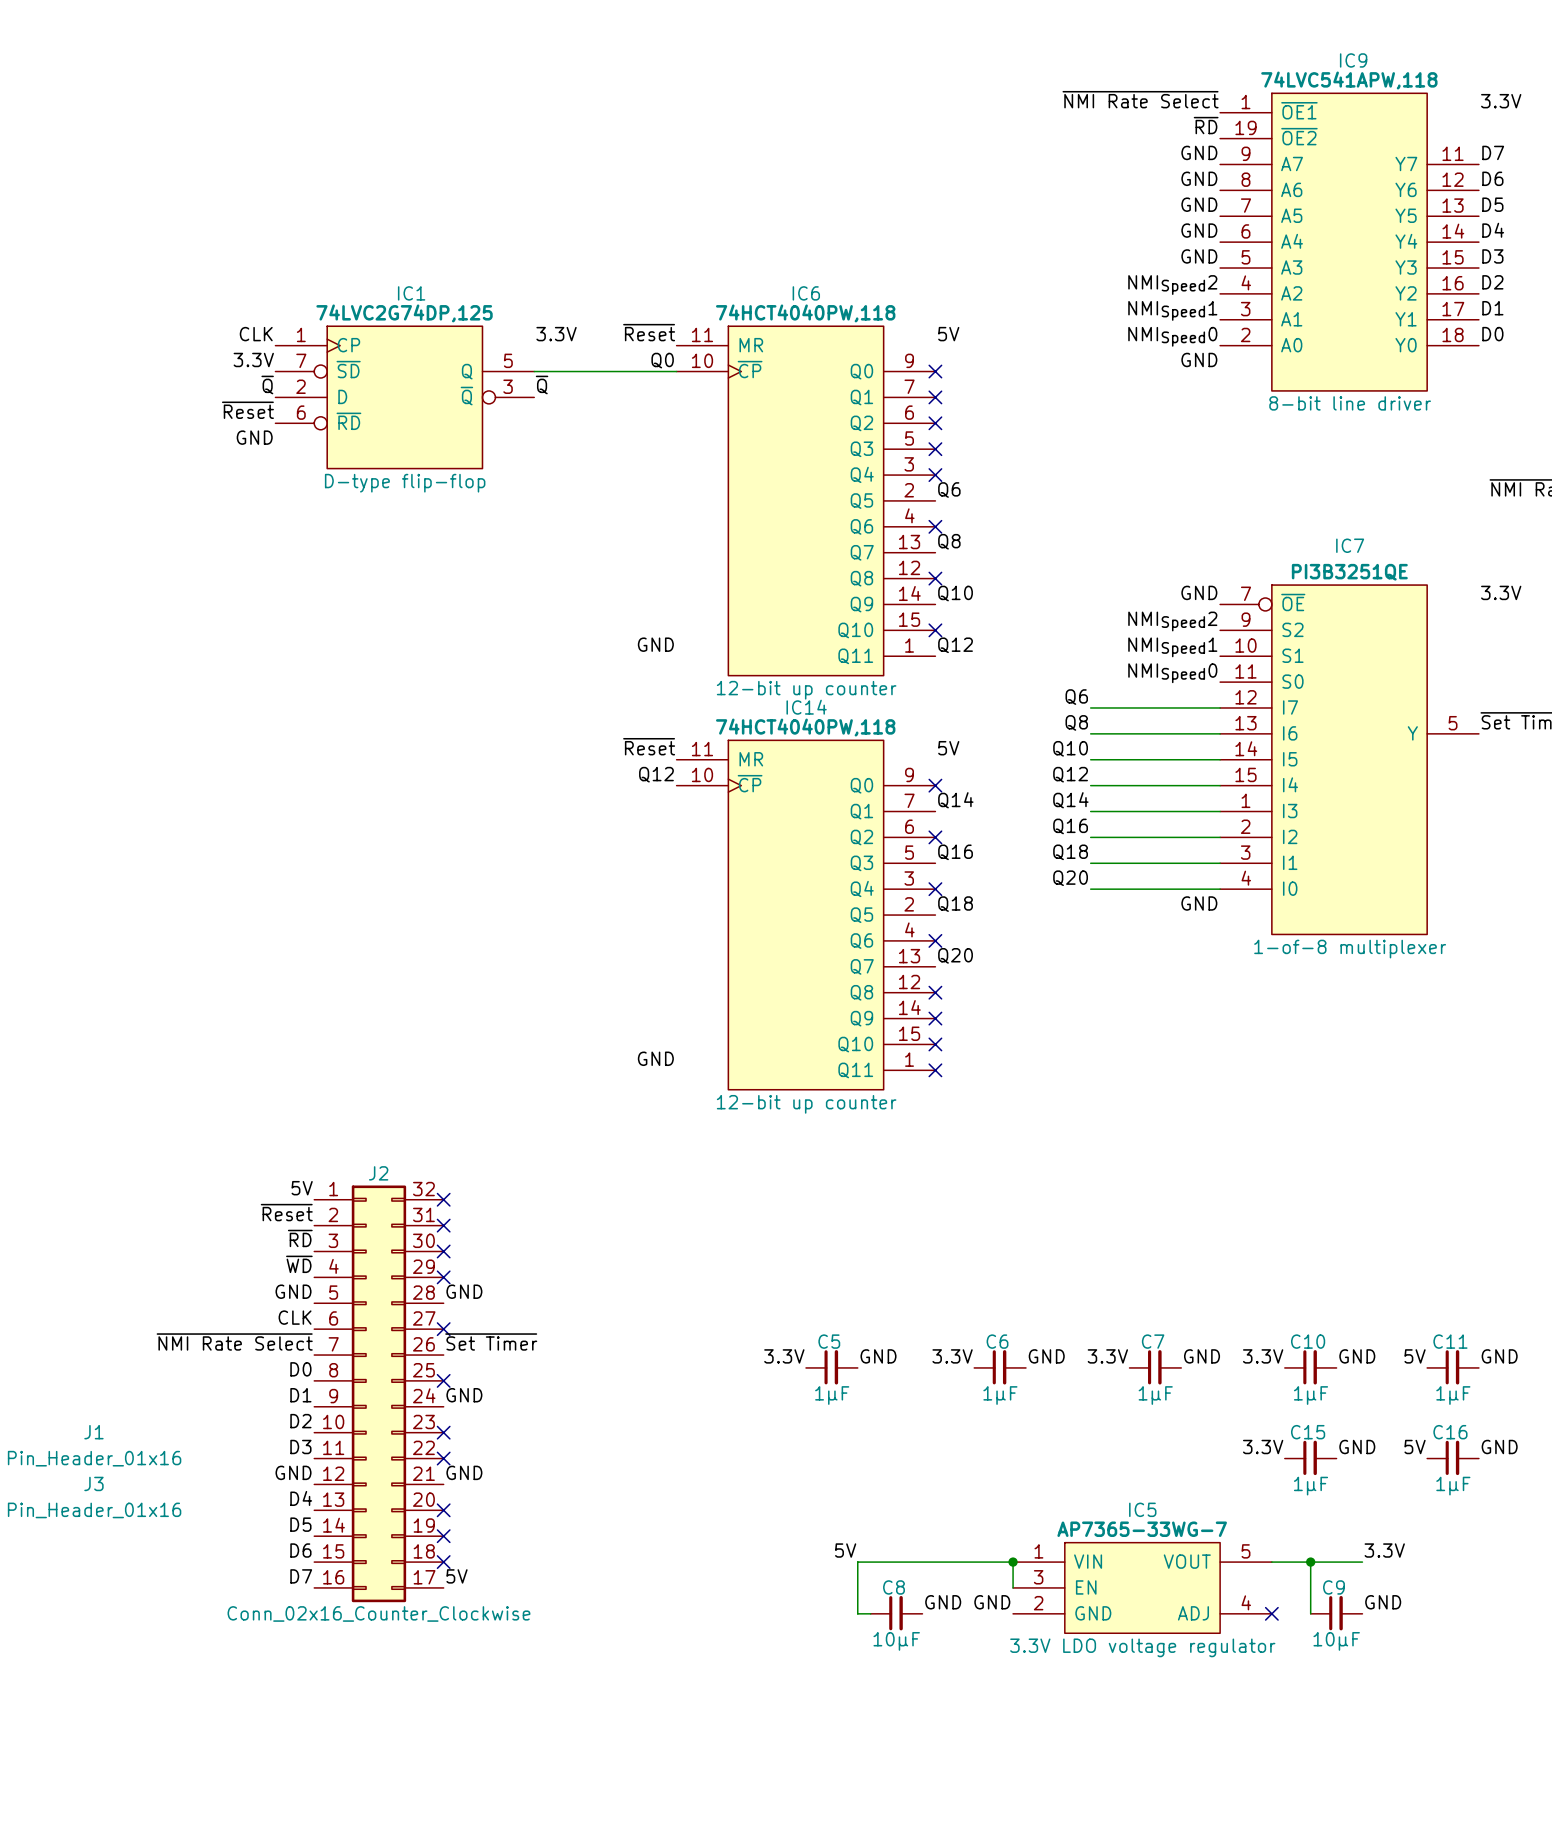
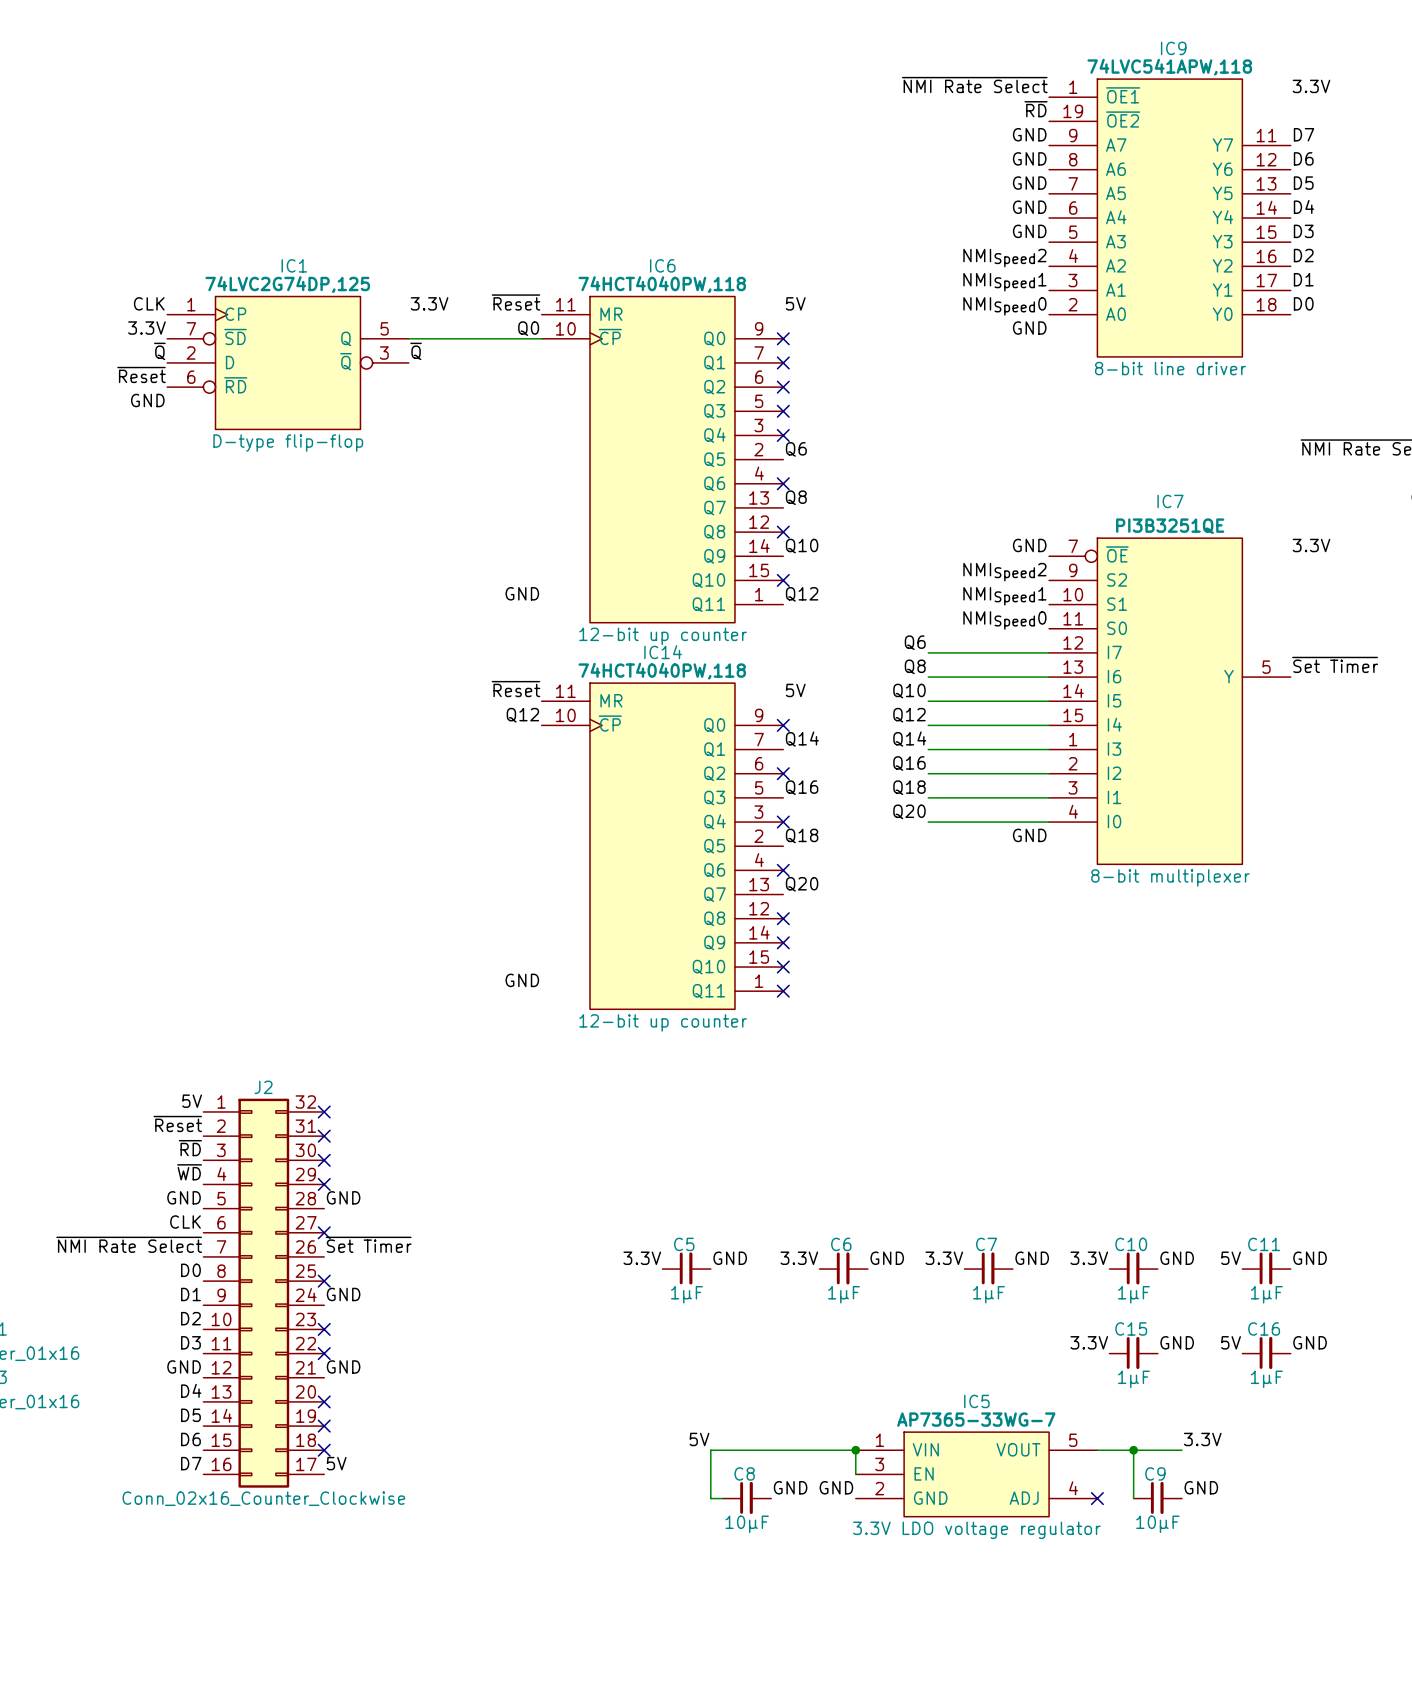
IC7 text: 1-of-8 multiplexer (1350, 949) -> 8-bit multiplexer (1170, 877)

